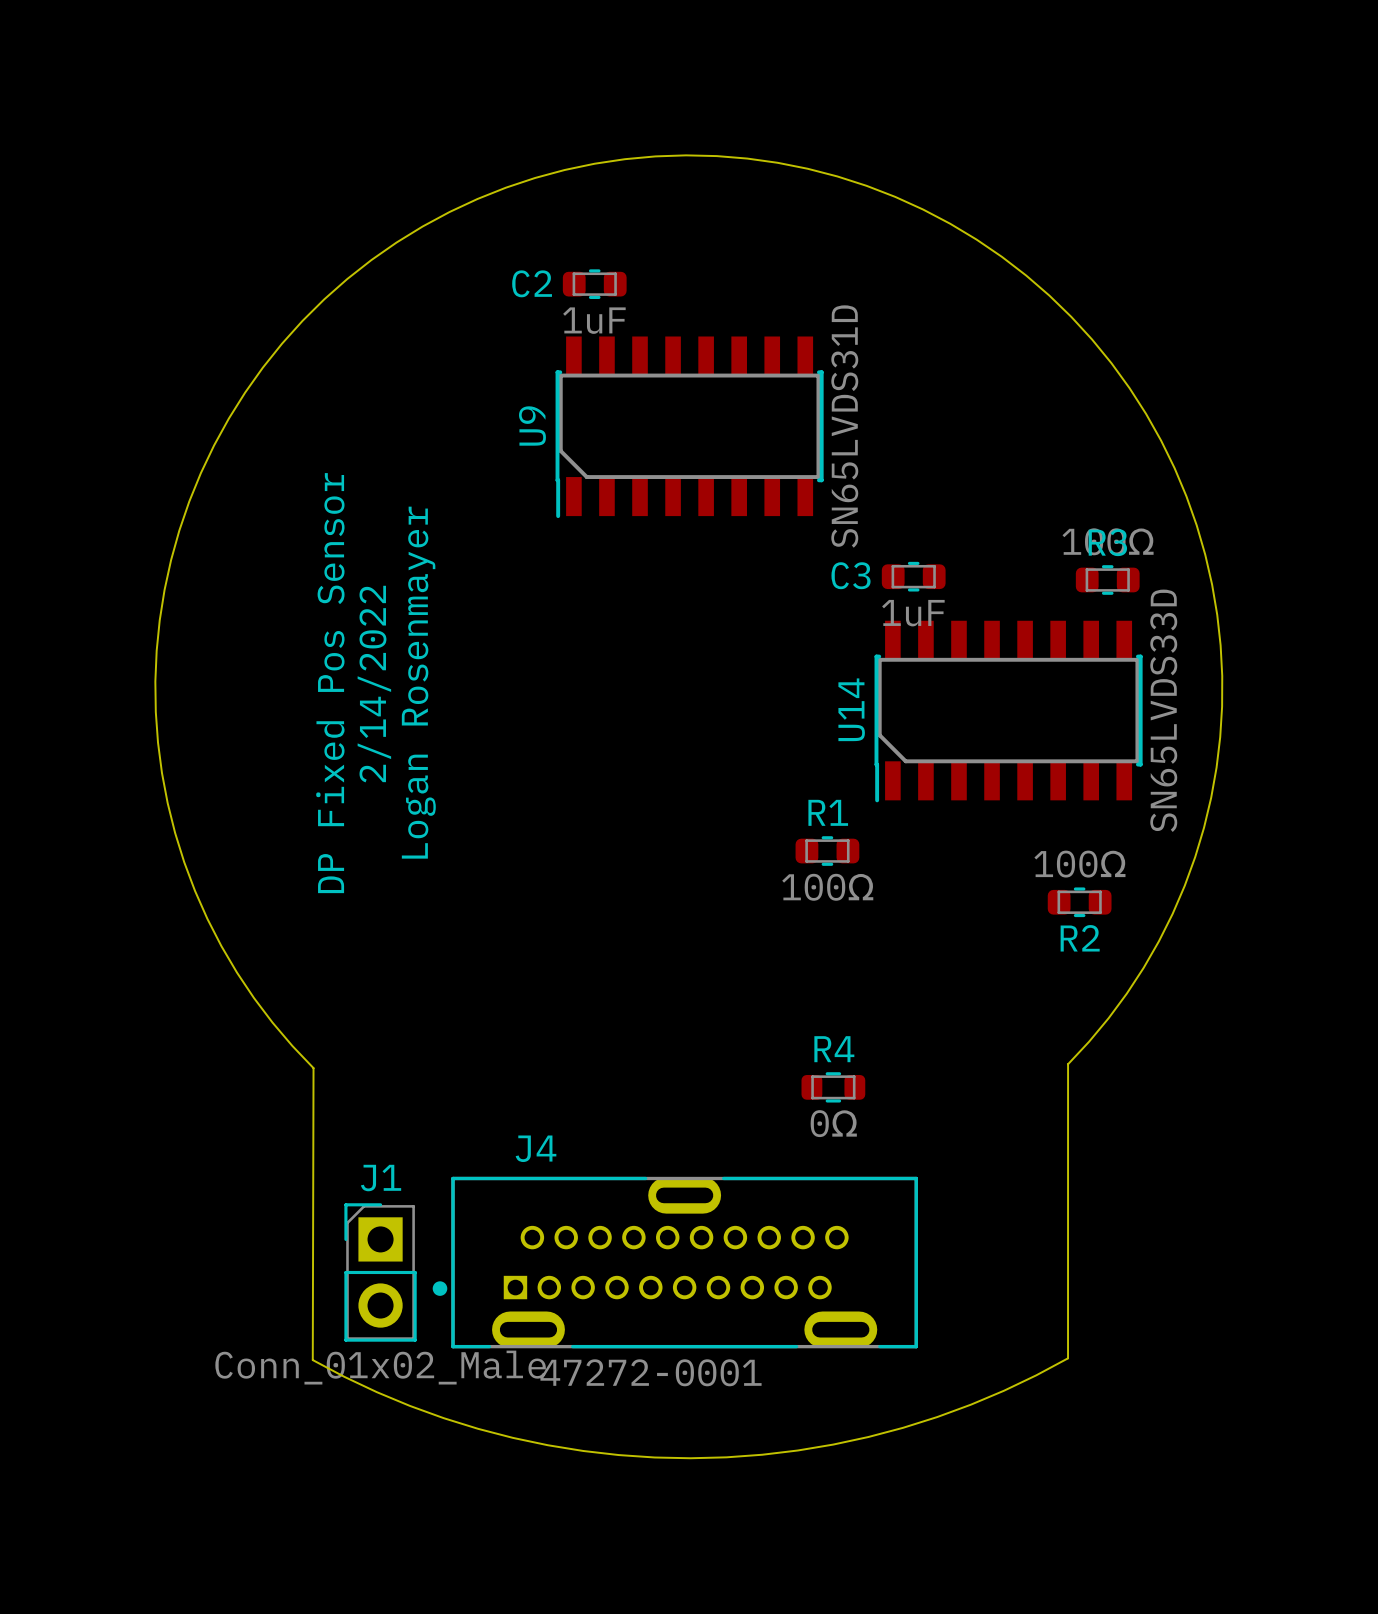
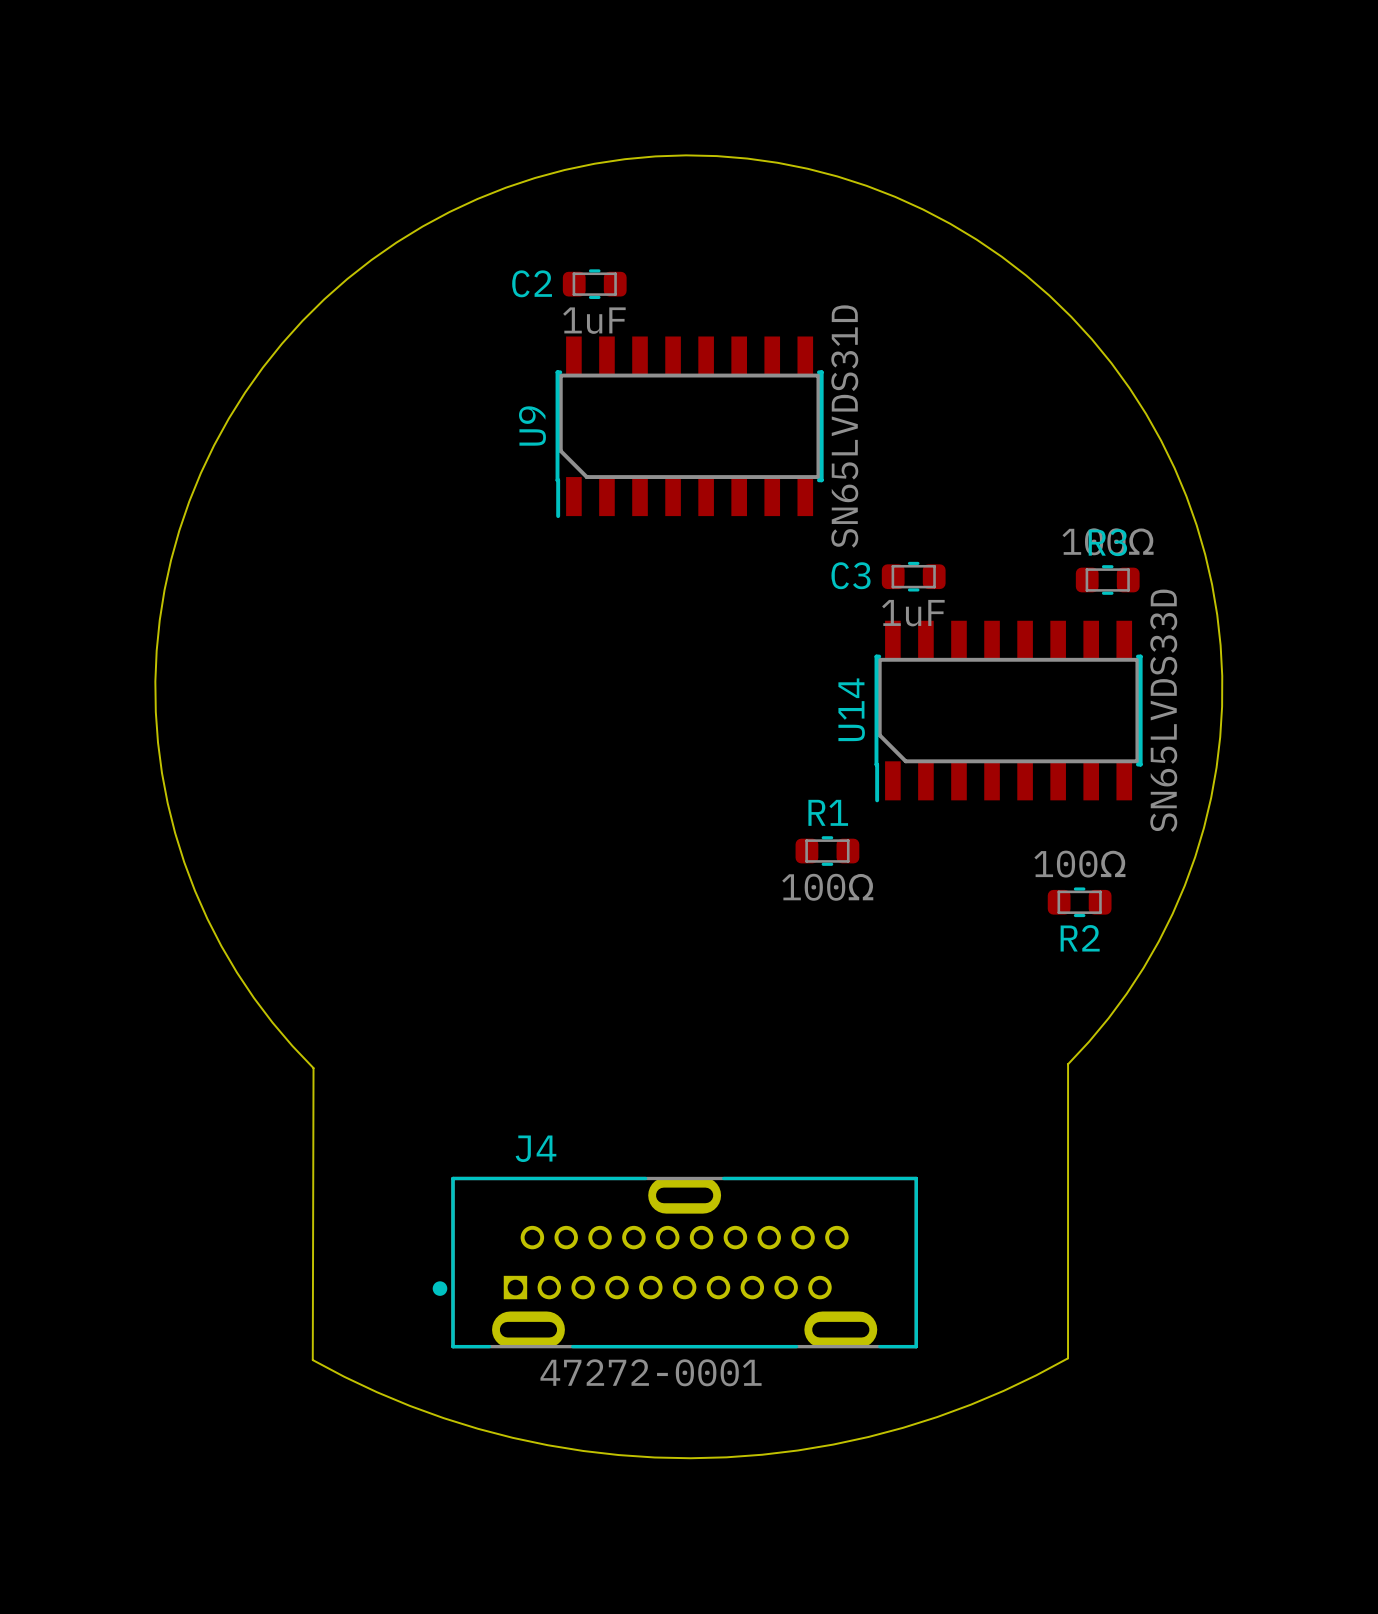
text: Logan Rosenmayer (418, 682) -> none
text: DP Fixed Pos Sensor (330, 683) -> none
text: 2/14/2022 (374, 684) -> none
R4: 0Ω (833, 1087) -> none
J1: Conn_01x02_Male (380, 1272) -> none

